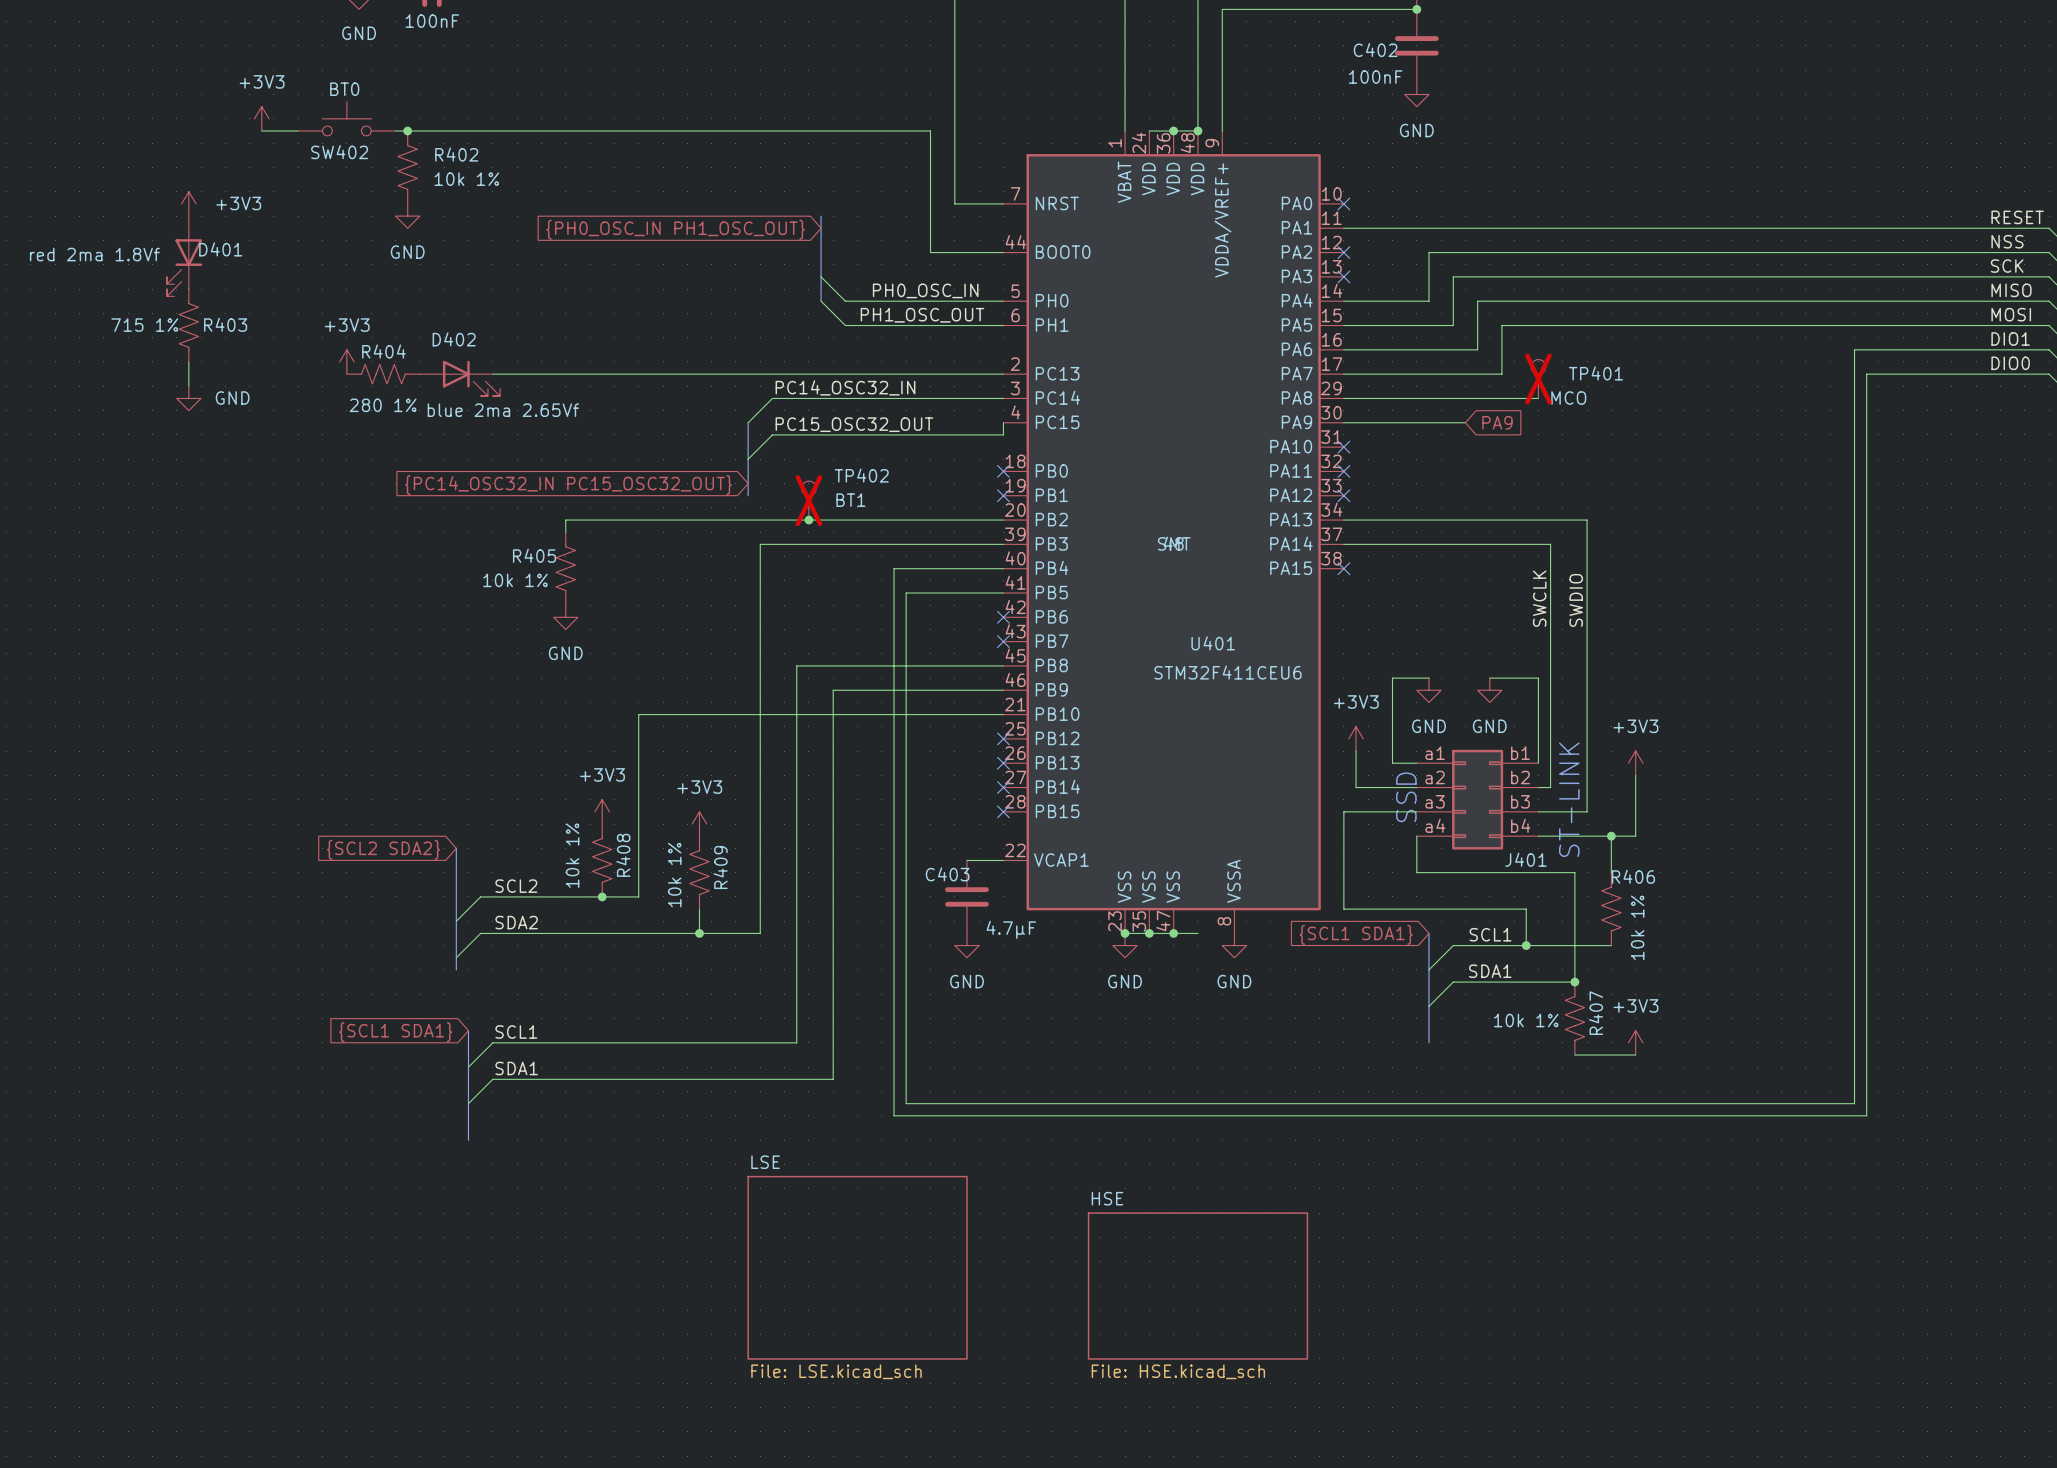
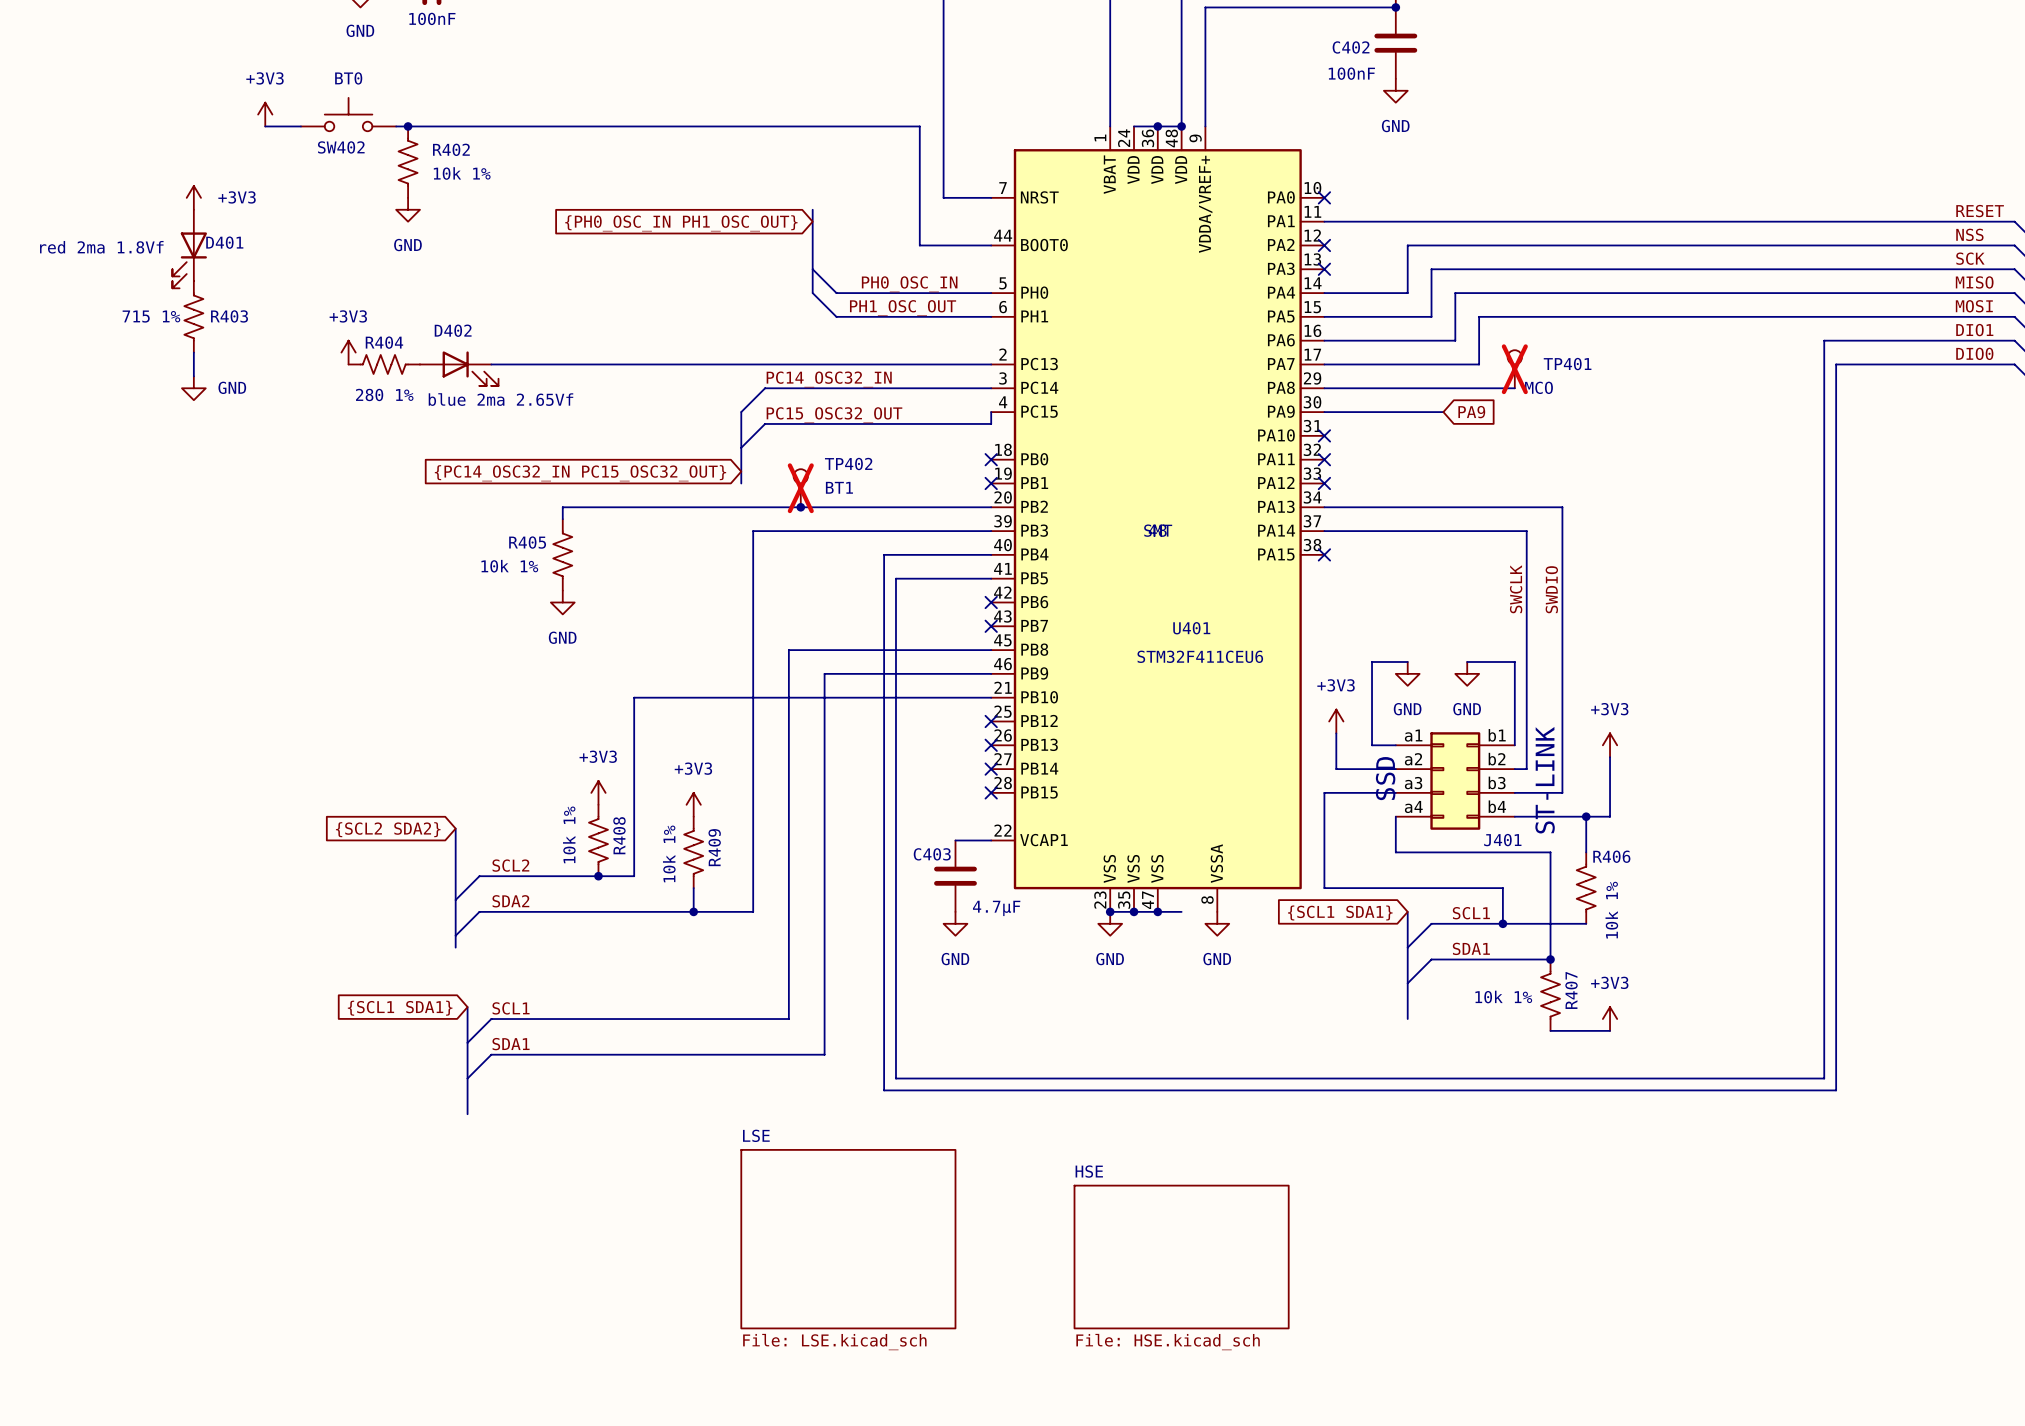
SW402 value: none -> BT0 (348, 78)
SW402 text: BT0 (344, 89) -> none

